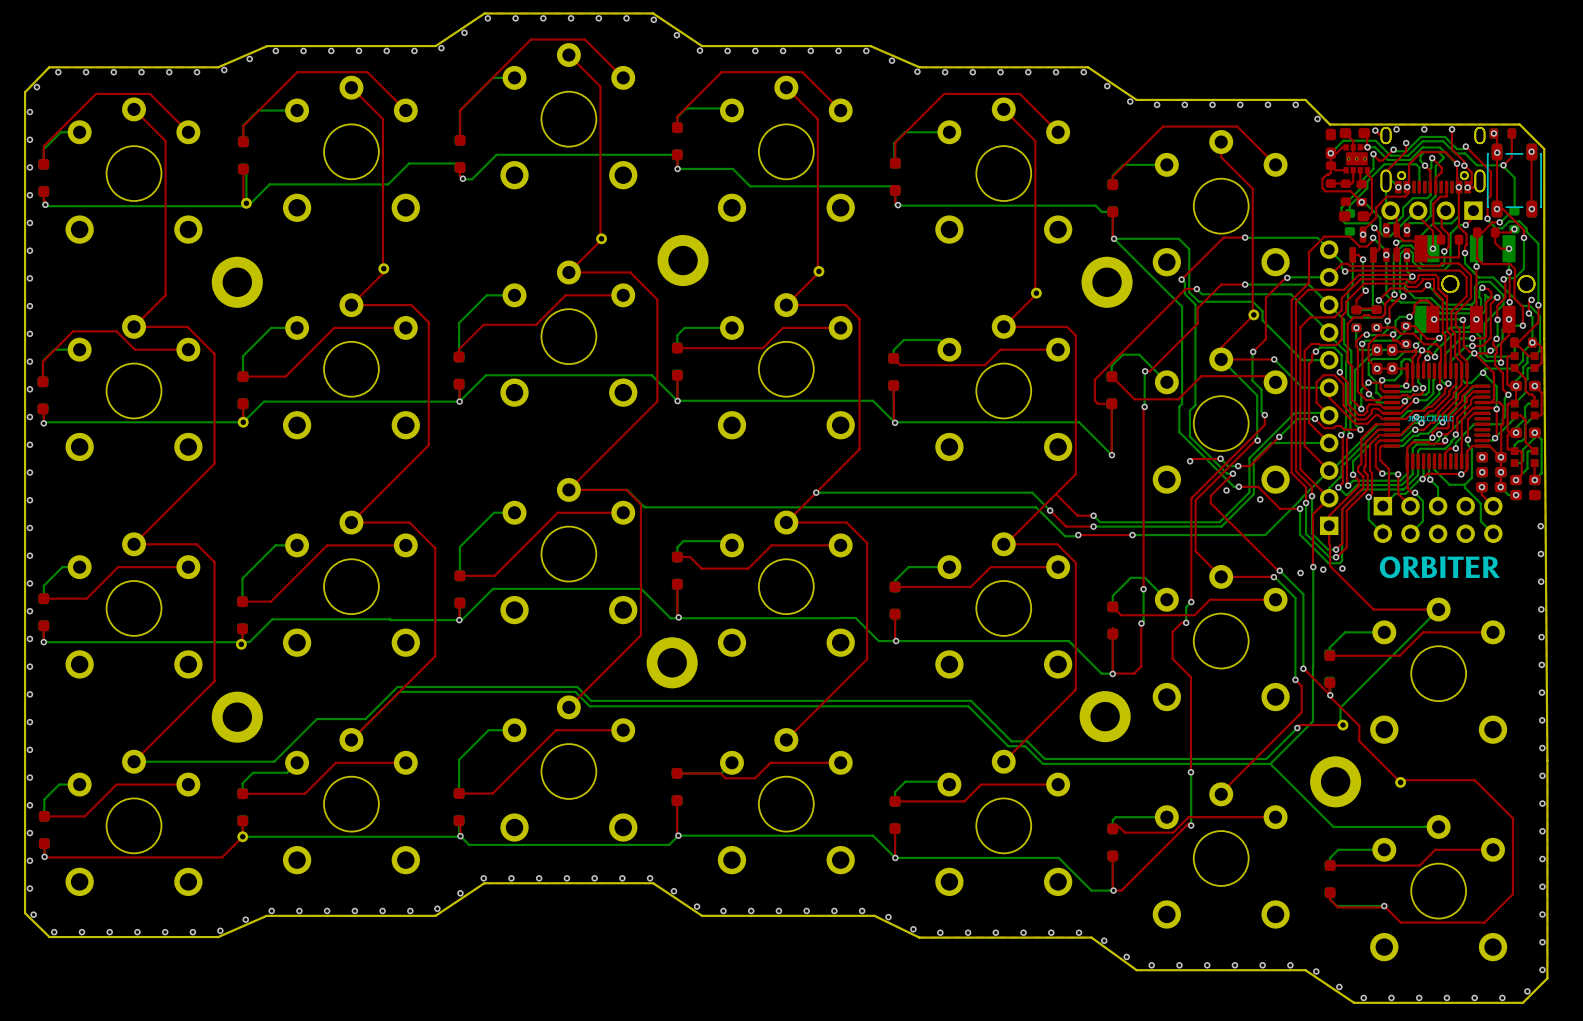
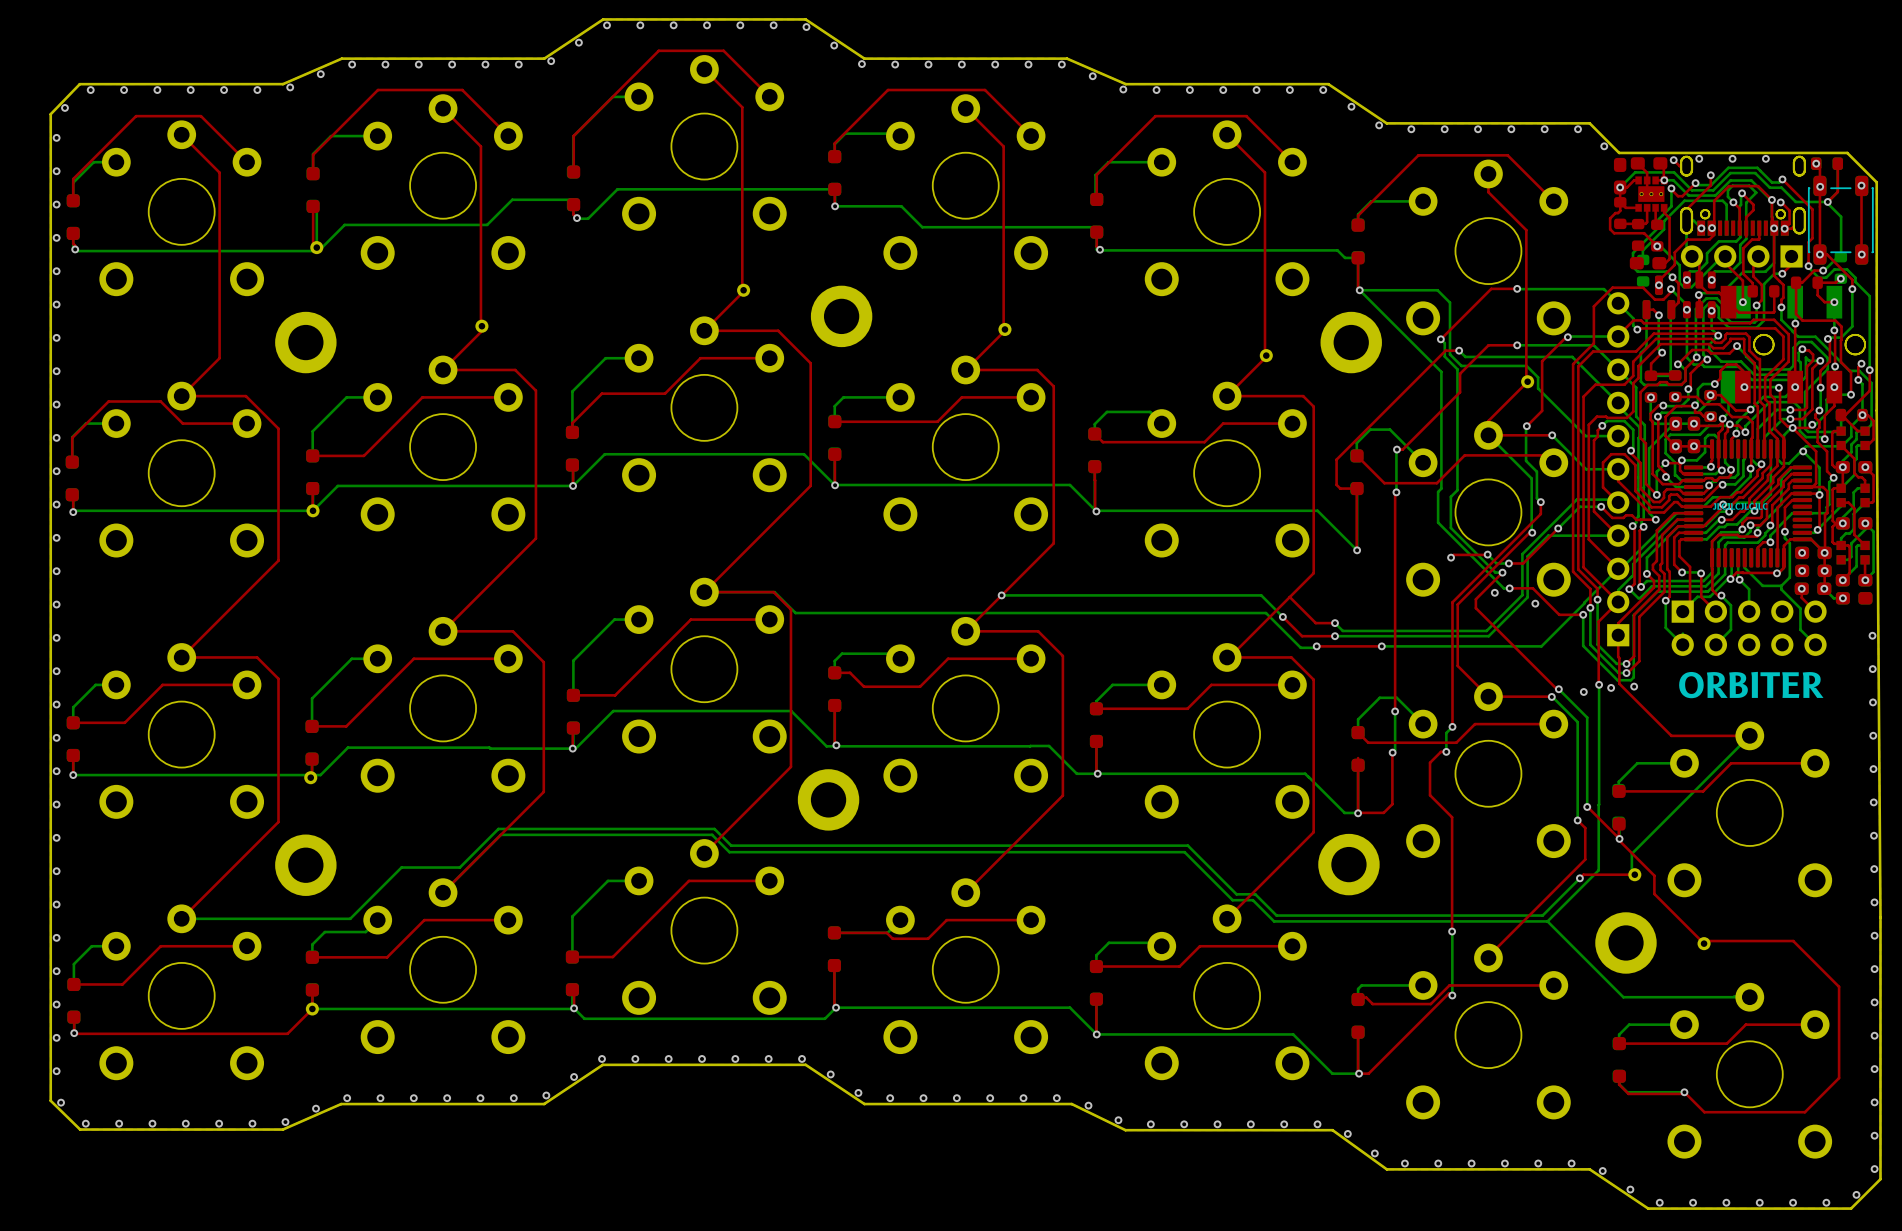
top track: (1452, 129) (1452, 149) (1464, 161) (1464, 165) -> none

